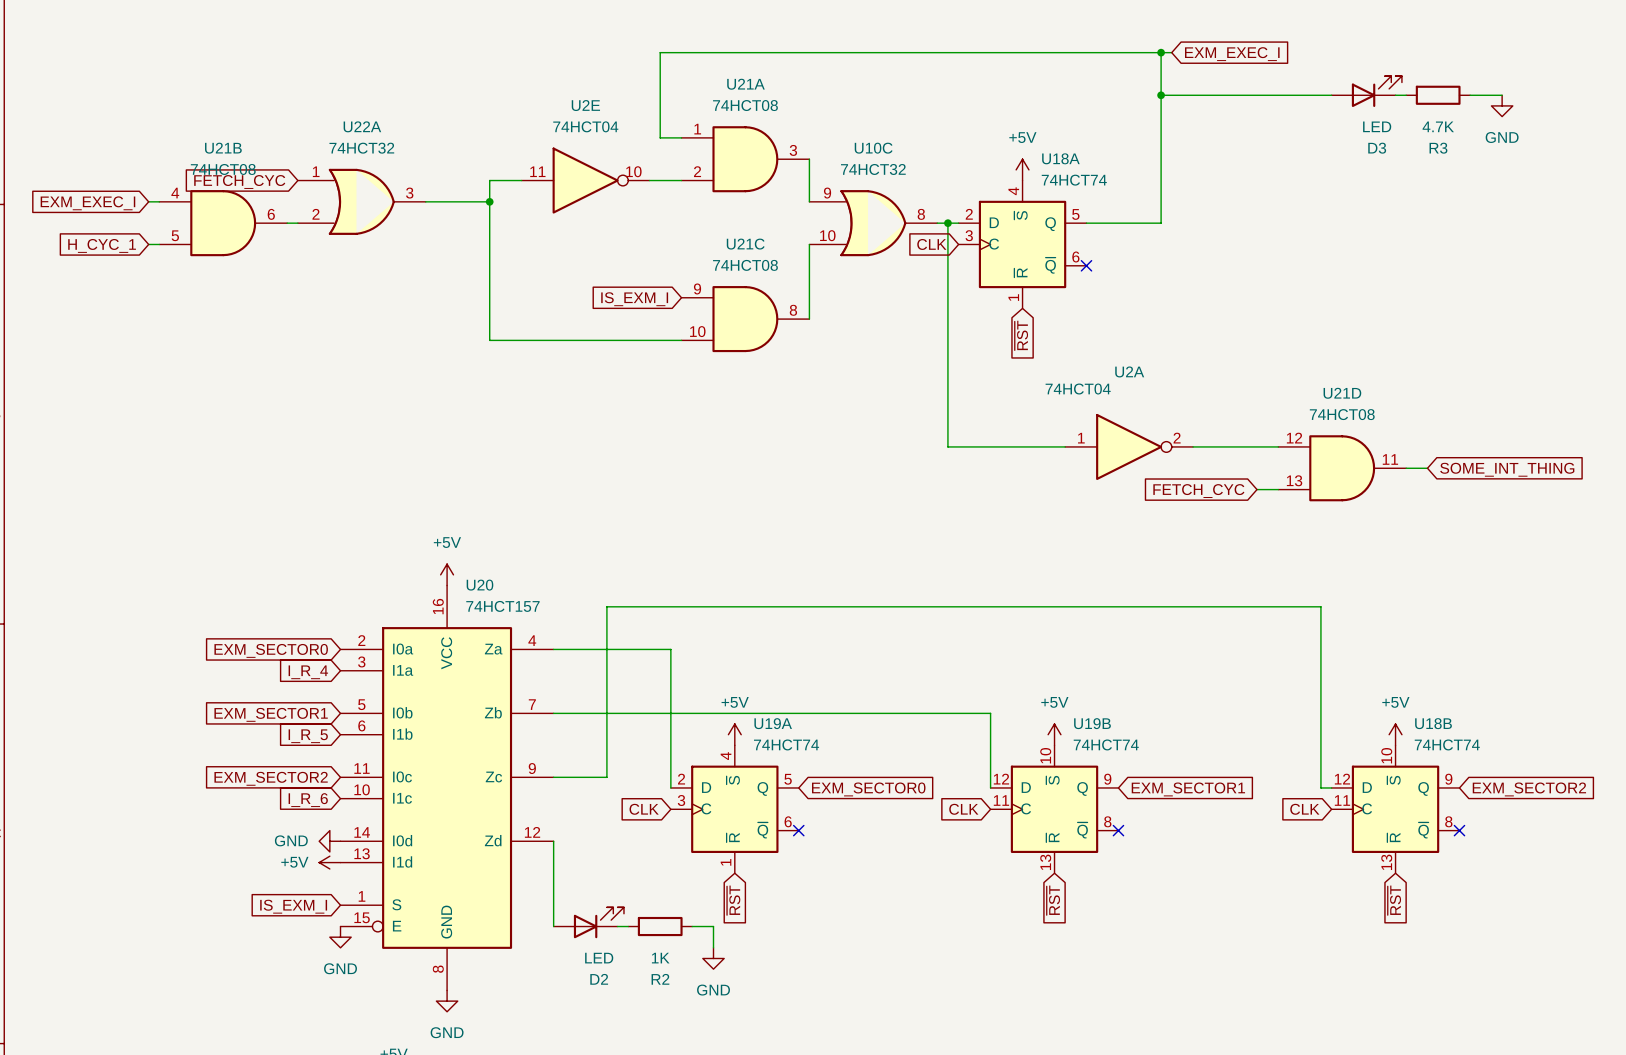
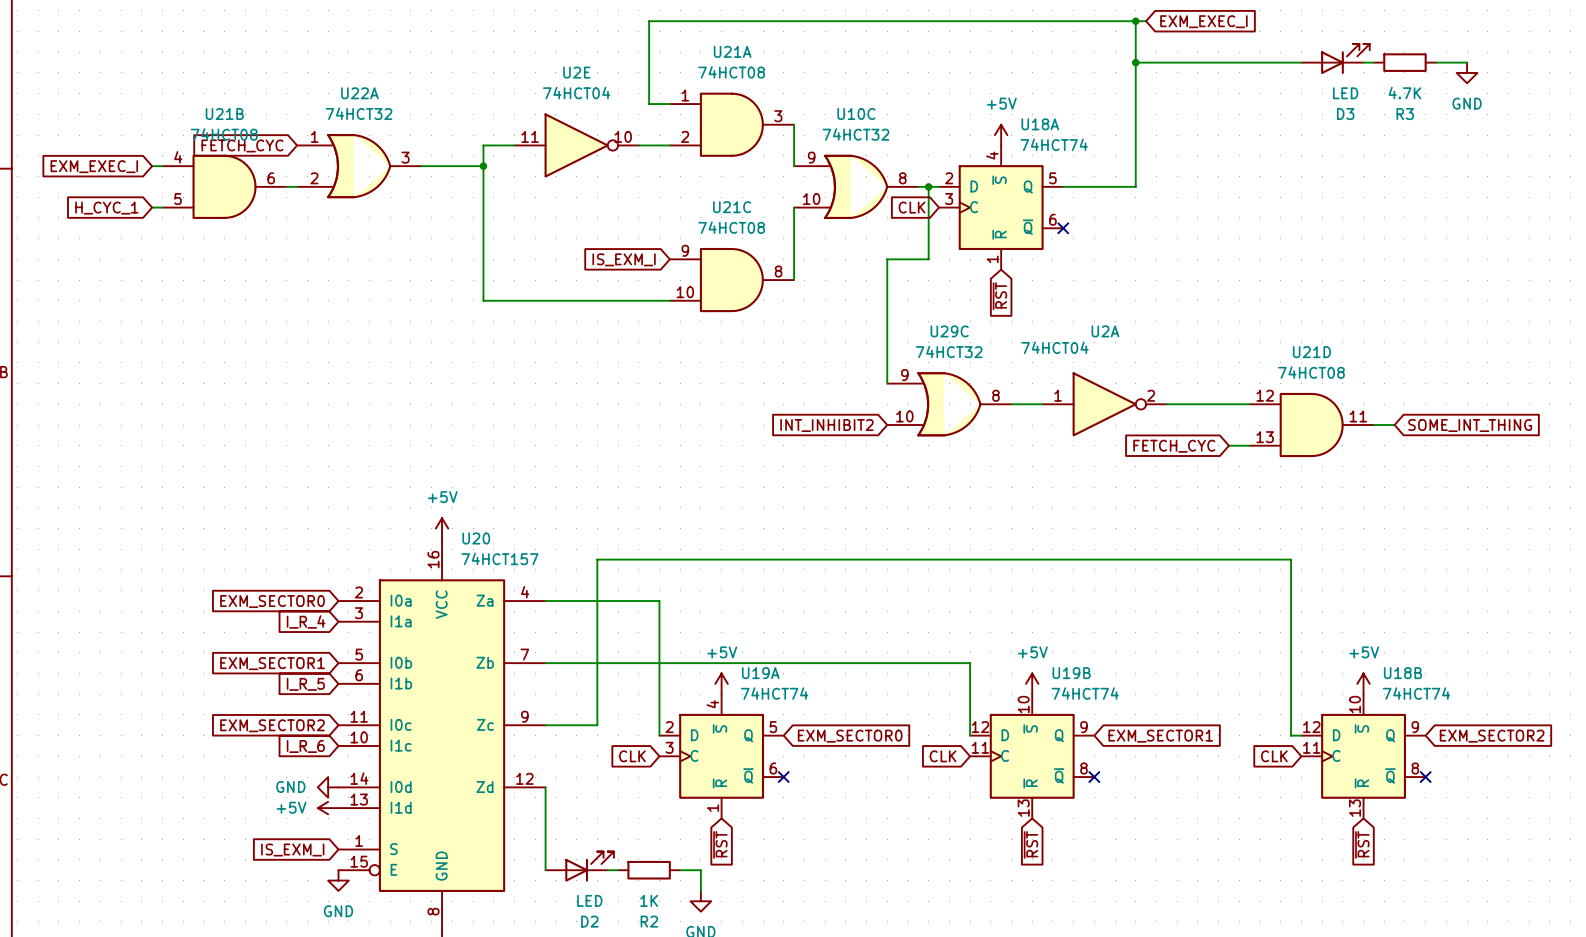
wire: (947, 297) (947, 446) (1033, 446) -> (928, 259) (887, 259) (887, 383)
U29C: none -> 74HCT32 (949, 404)
global label: none -> INT_INHIBIT2 (826, 425)

